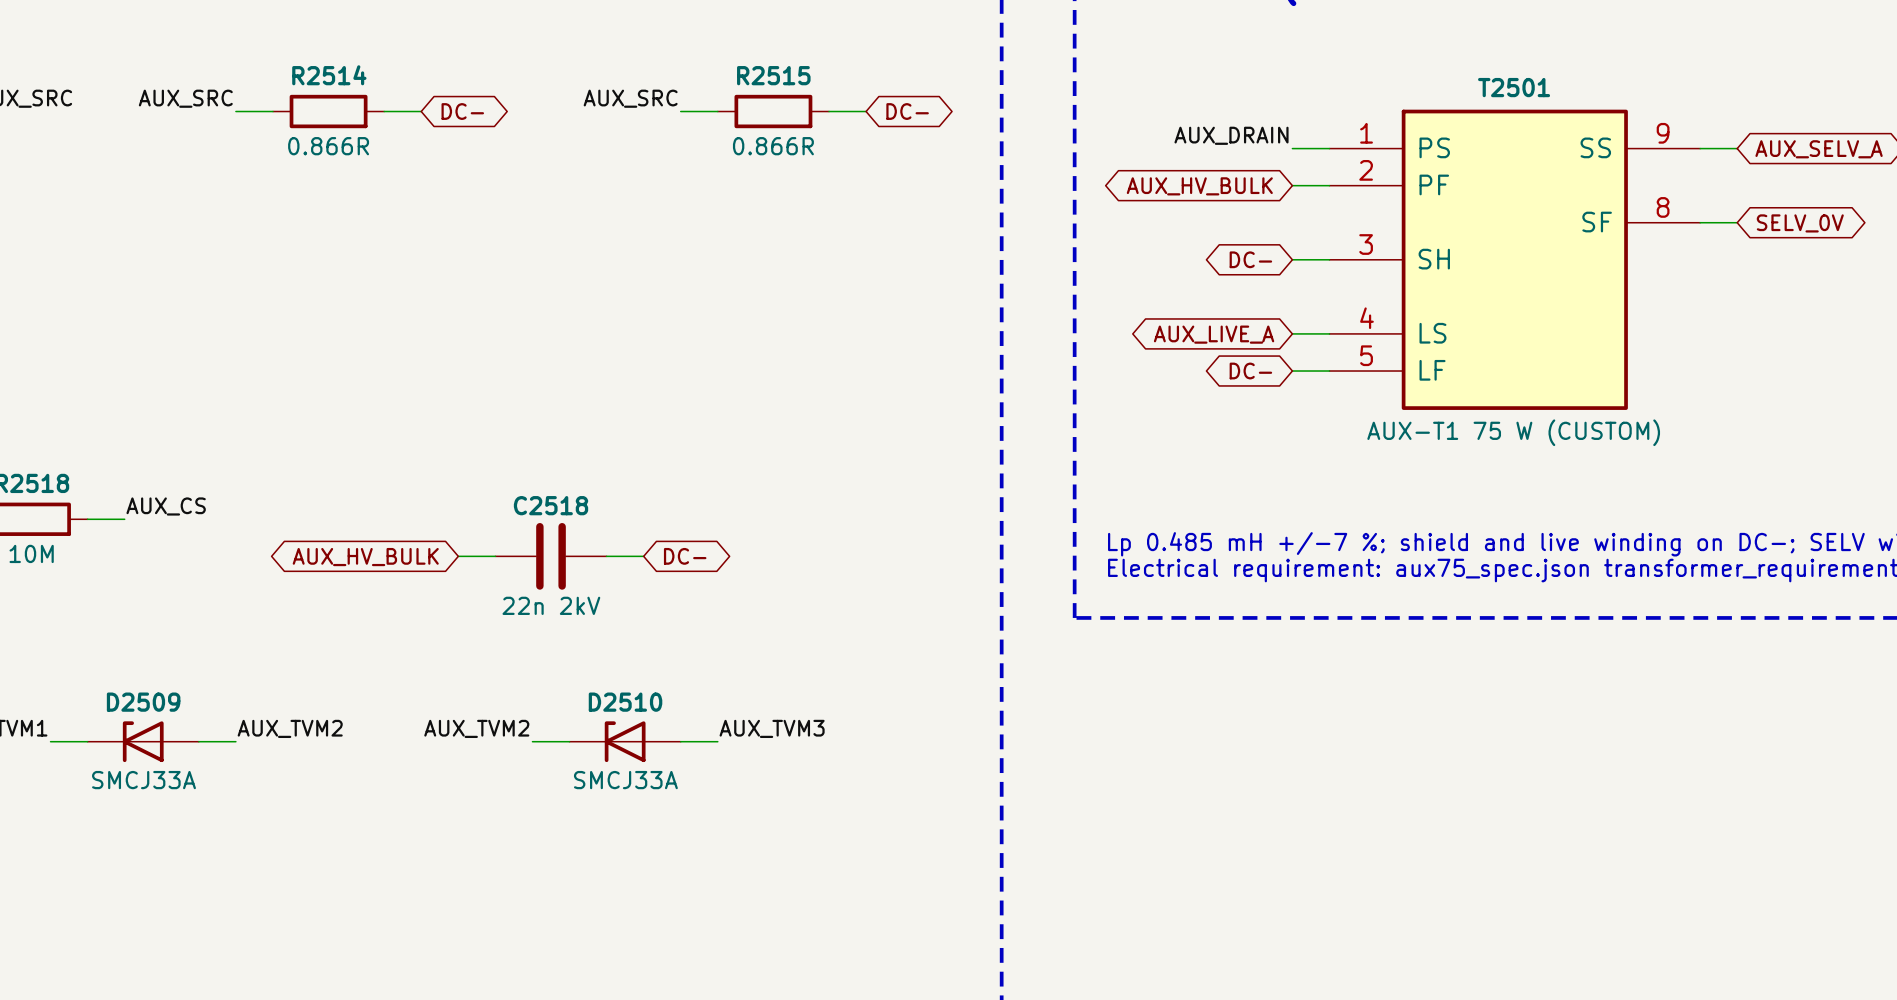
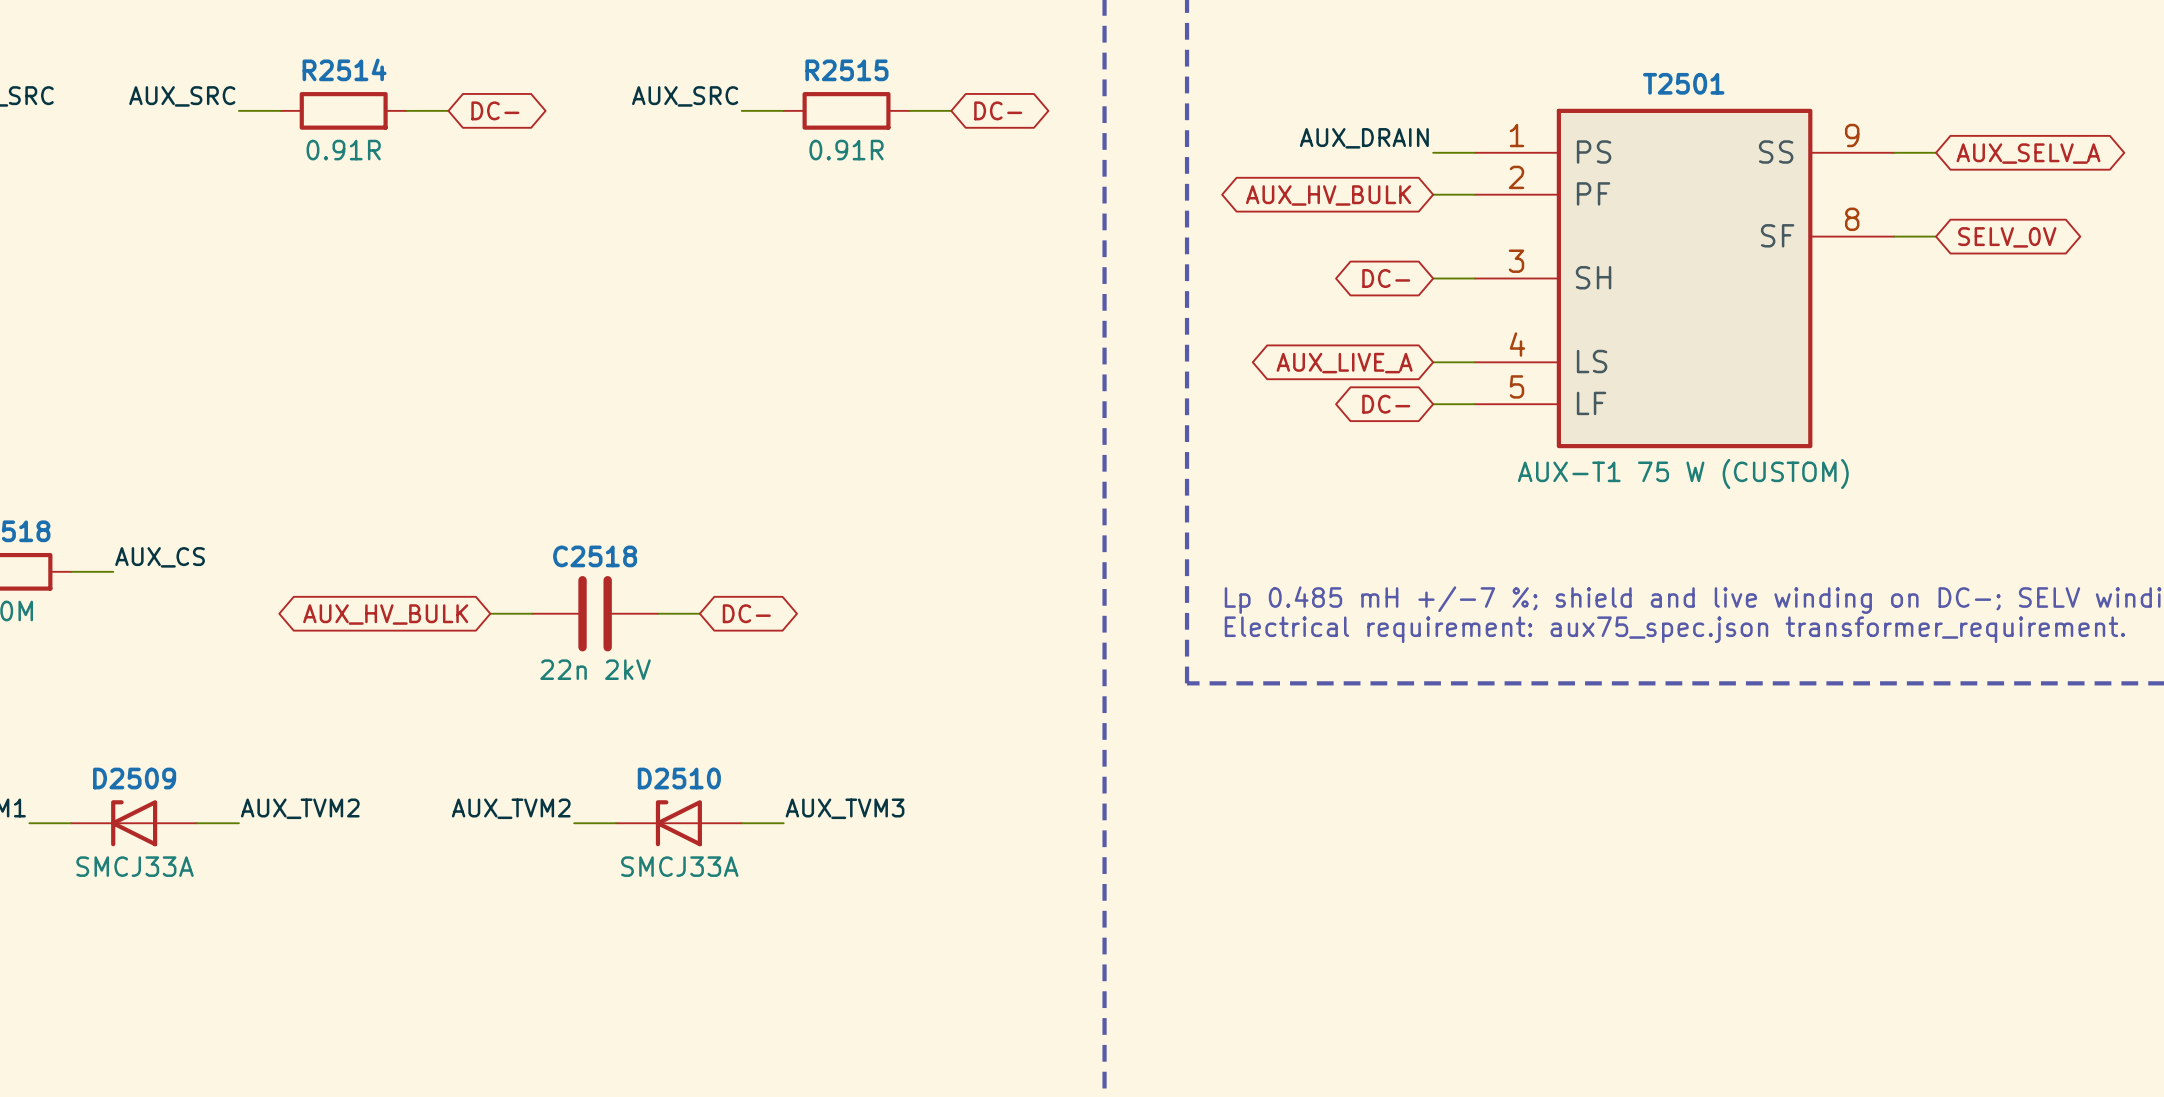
R2514 value: 0.866R (328, 146) -> 0.91R (343, 150)
R2515 value: 0.866R (773, 146) -> 0.91R (846, 150)

